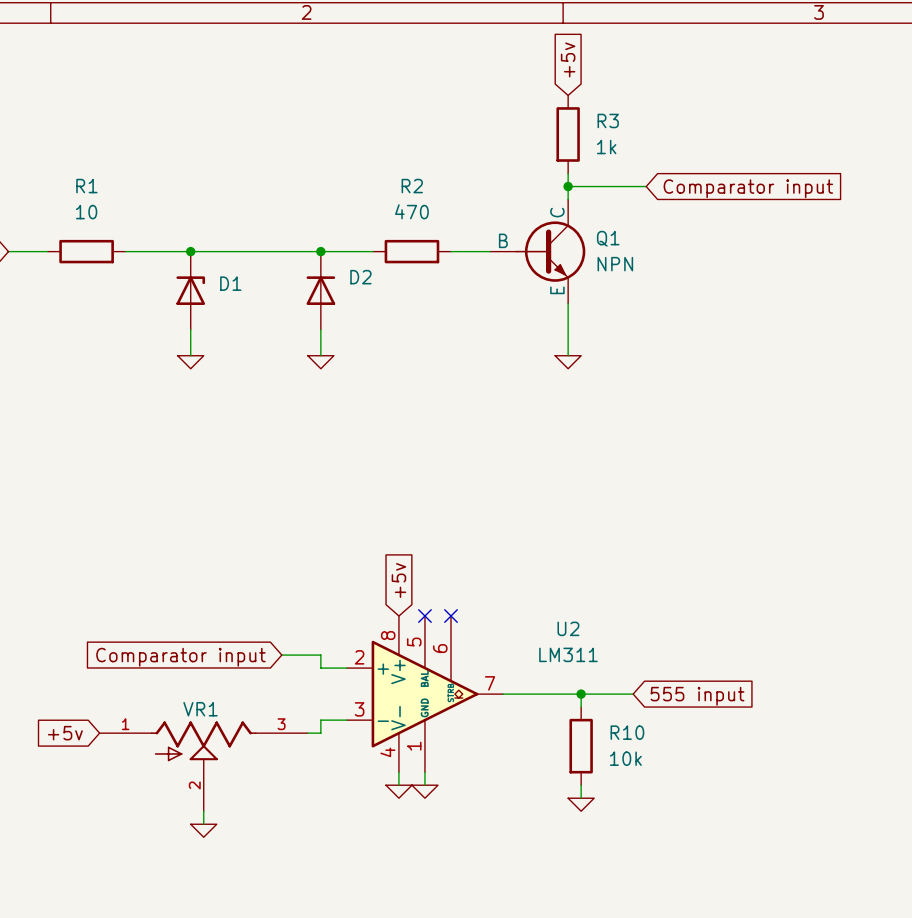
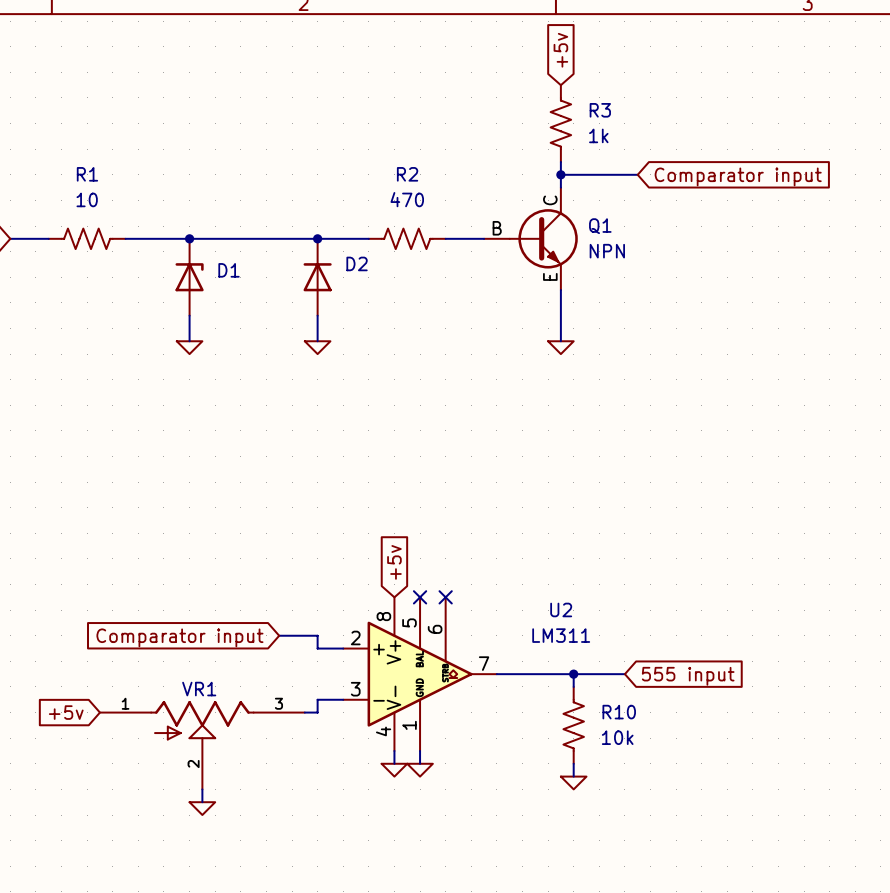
R3 symbol: [556, 95, 580, 174] -> [550, 85, 572, 163]
R1 symbol: [47, 239, 126, 264] -> [48, 228, 126, 250]
R2 symbol: [372, 239, 452, 264] -> [368, 228, 446, 250]
R10 symbol: [569, 707, 593, 786] -> [563, 686, 584, 764]

